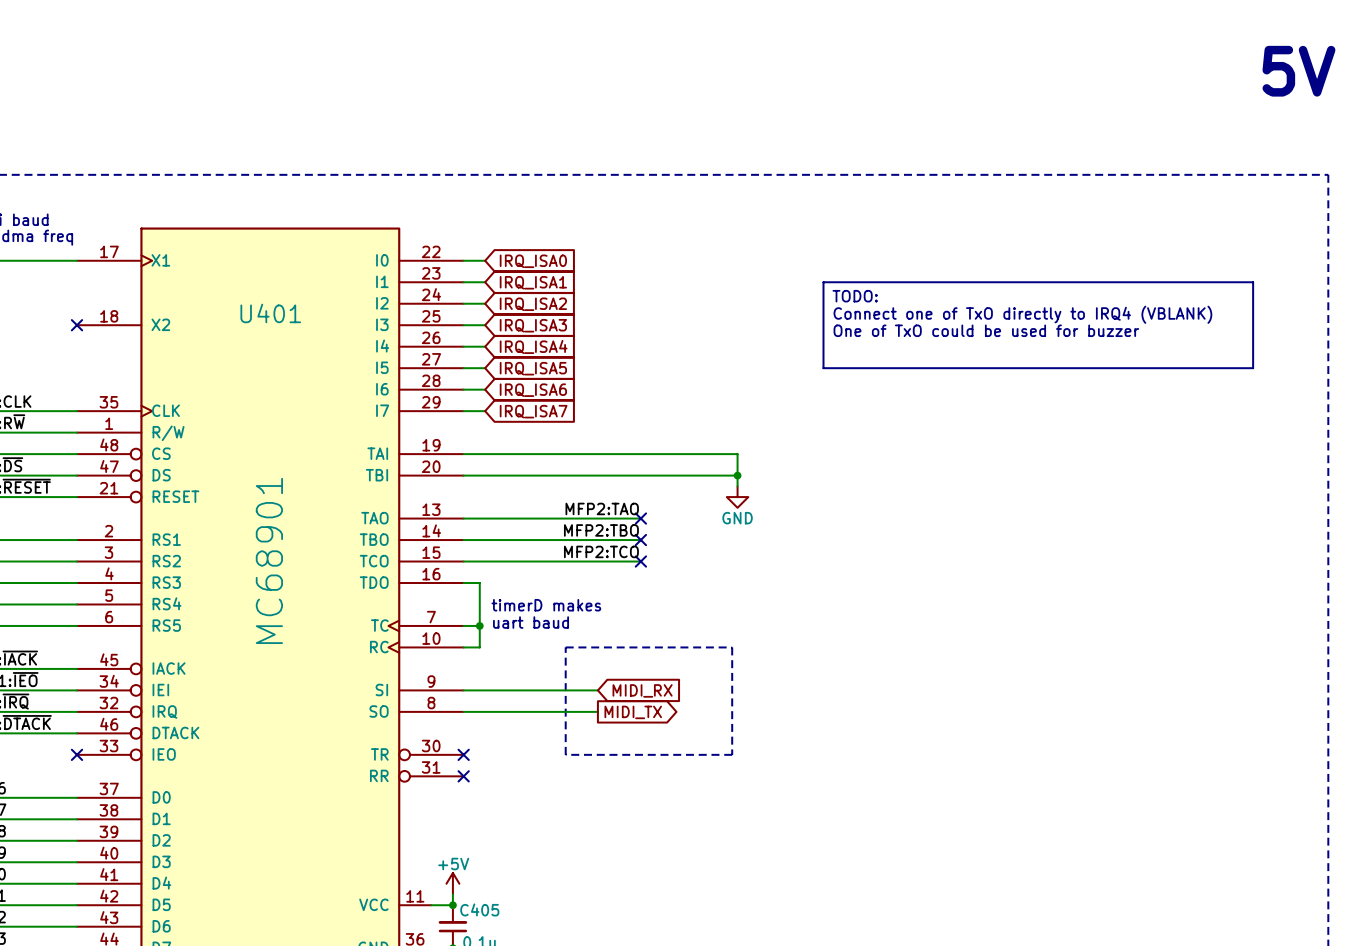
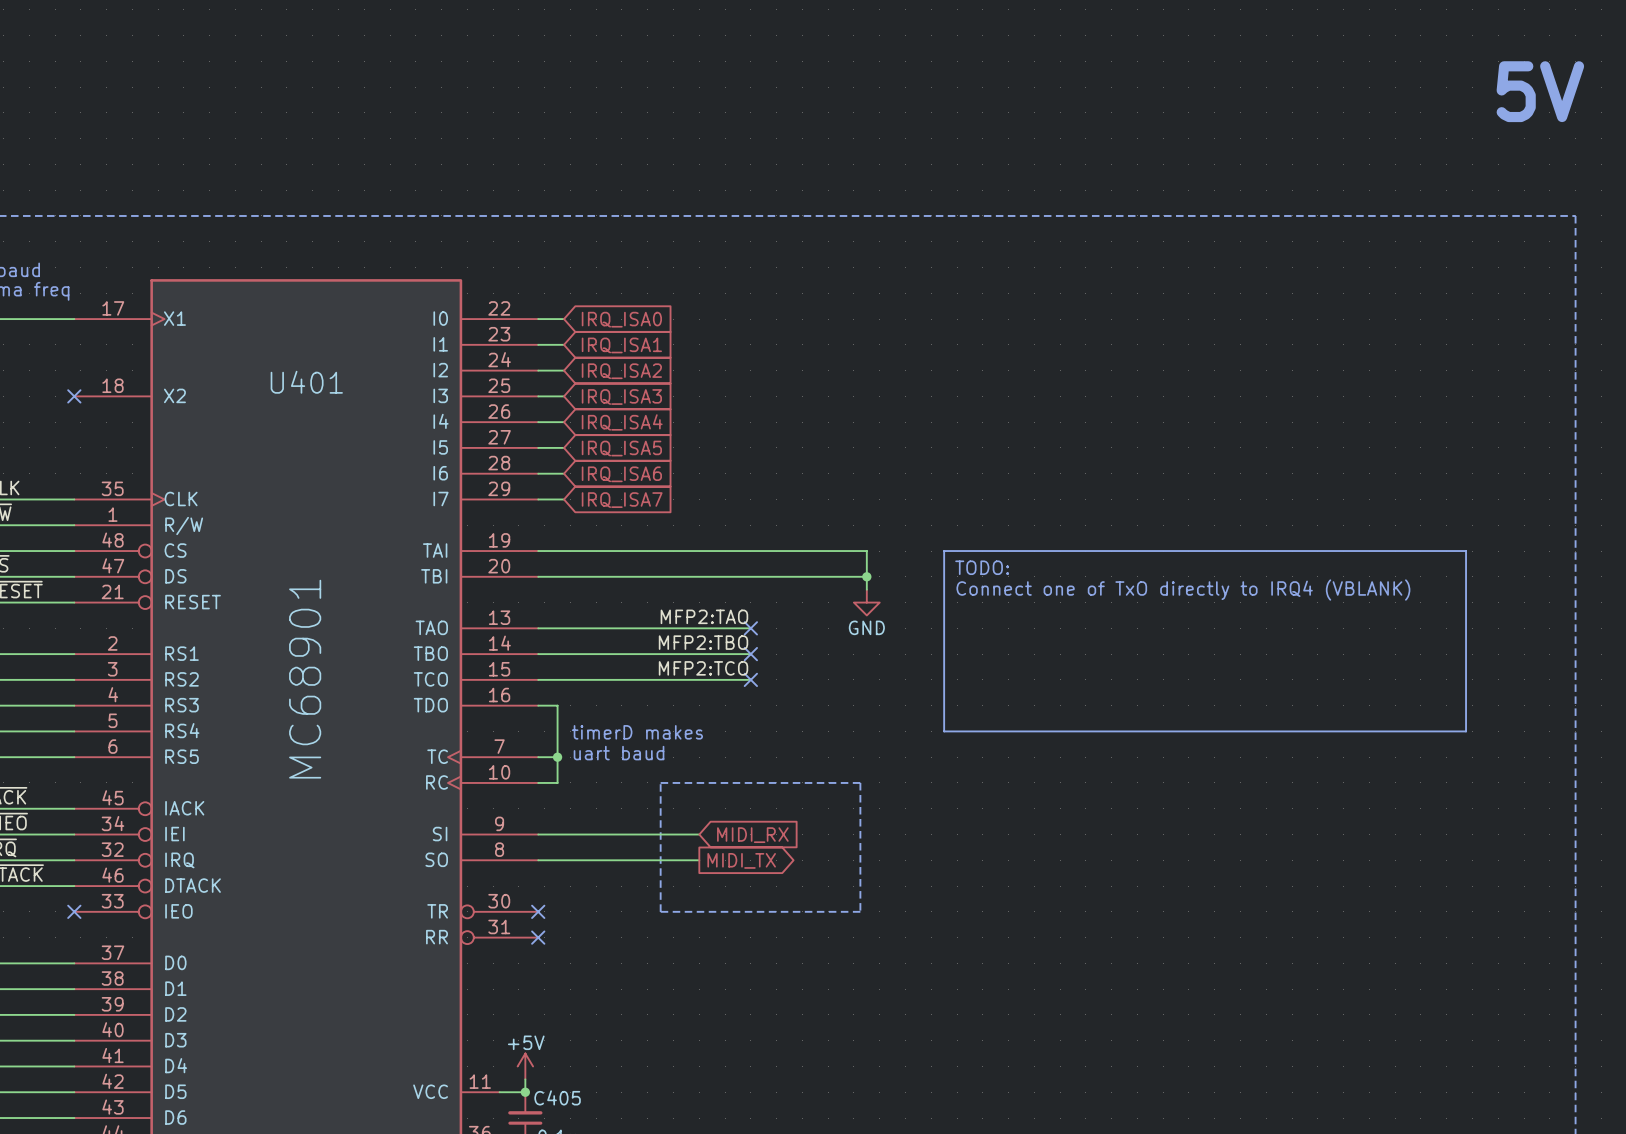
line: (823, 282) (1253, 282) (1253, 368) (823, 368) (823, 282) -> none
text position: TODO: (855, 296) -> TODO: (982, 567)
text position: Connect one of TxO directly to IRQ4 (VBLANK) (1022, 314) -> Connect one of TxO directly to IRQ4 (VBLANK) (1183, 590)
text: One of TxO could be used for buzzer (986, 330) -> none
line: none -> (944, 551) (1466, 551) (1466, 731) (944, 731) (944, 551)

